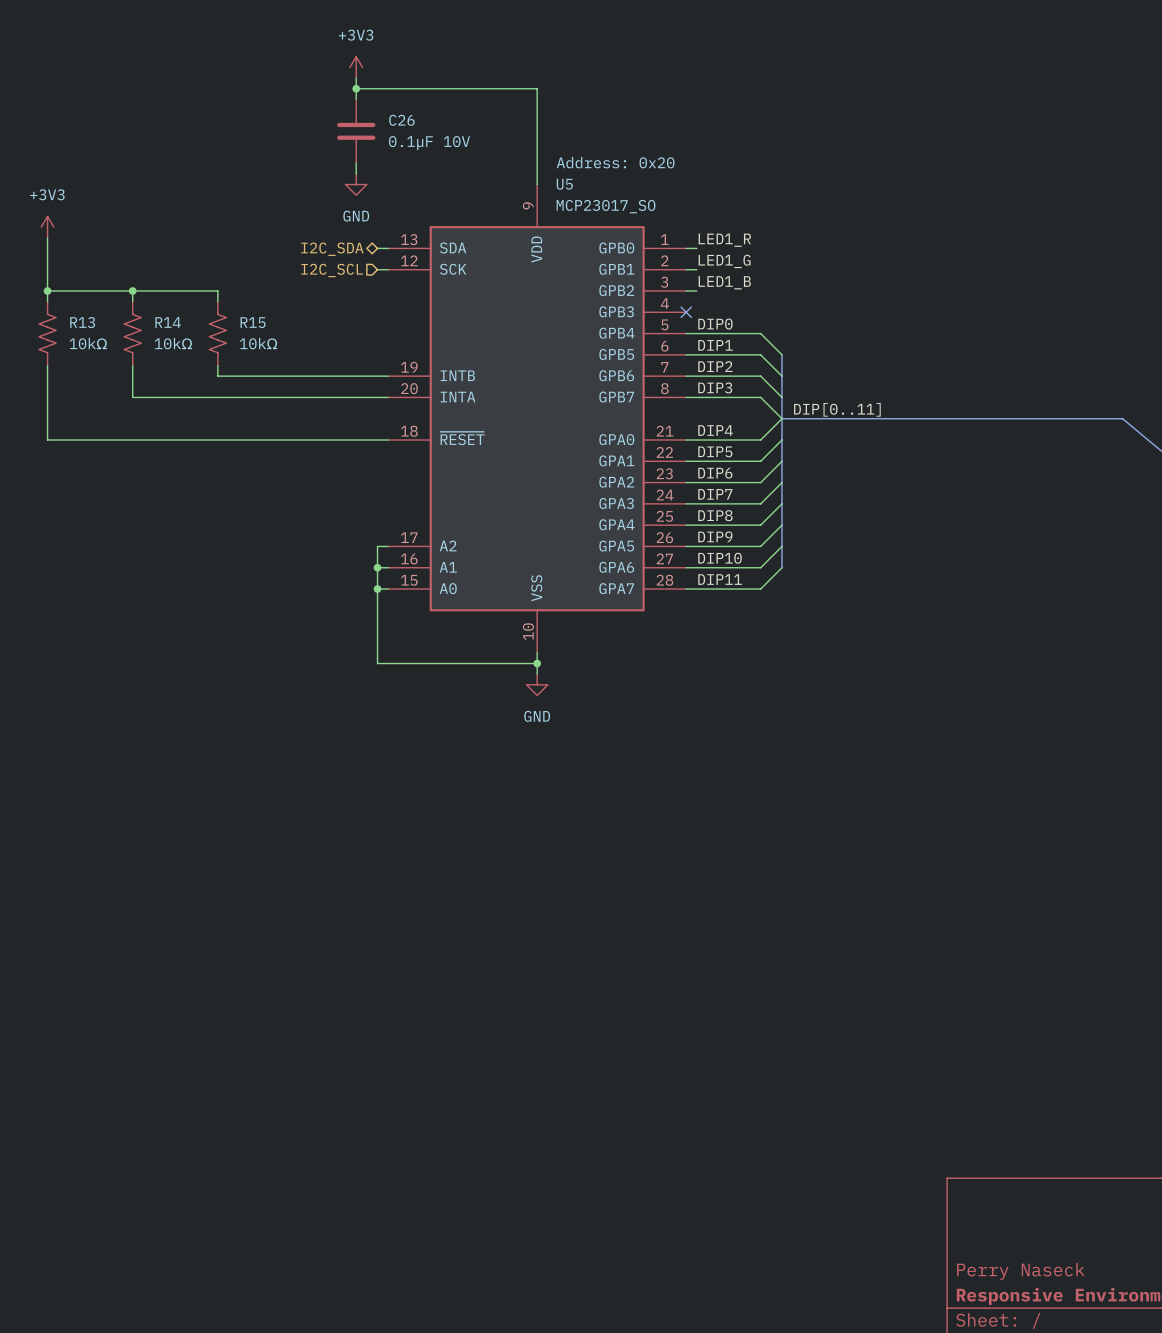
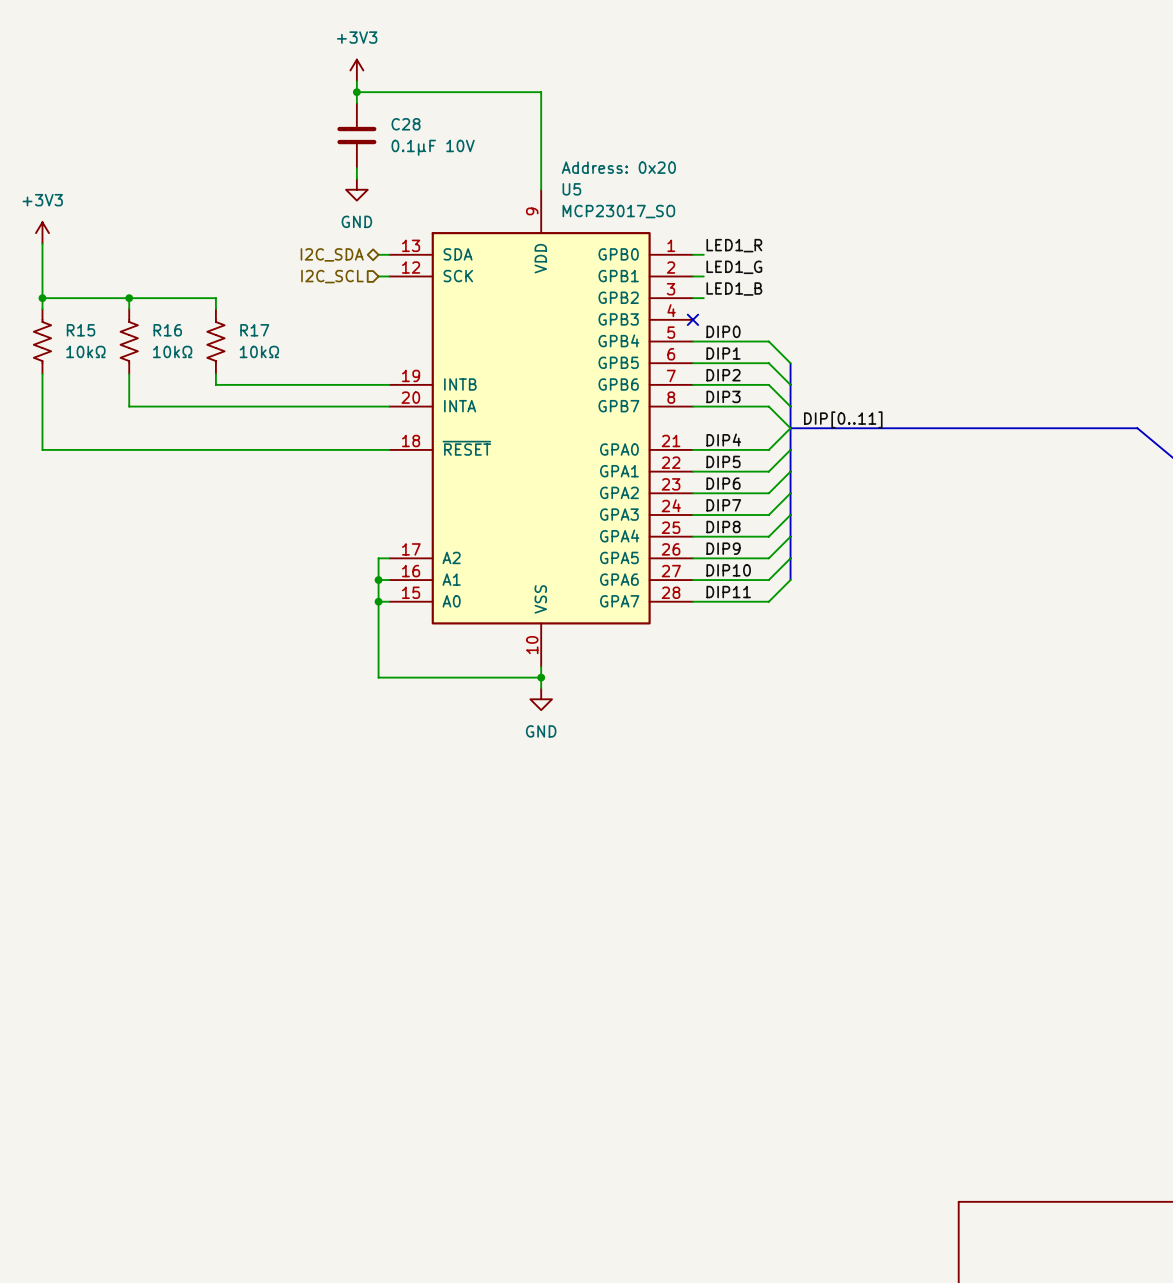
C26 name: C26 (401, 120) -> C28 (406, 124)
R13 name: R13 (82, 322) -> R15 (81, 330)
R14 name: R14 (168, 322) -> R16 (167, 330)
R15 name: R15 (253, 322) -> R17 (254, 330)

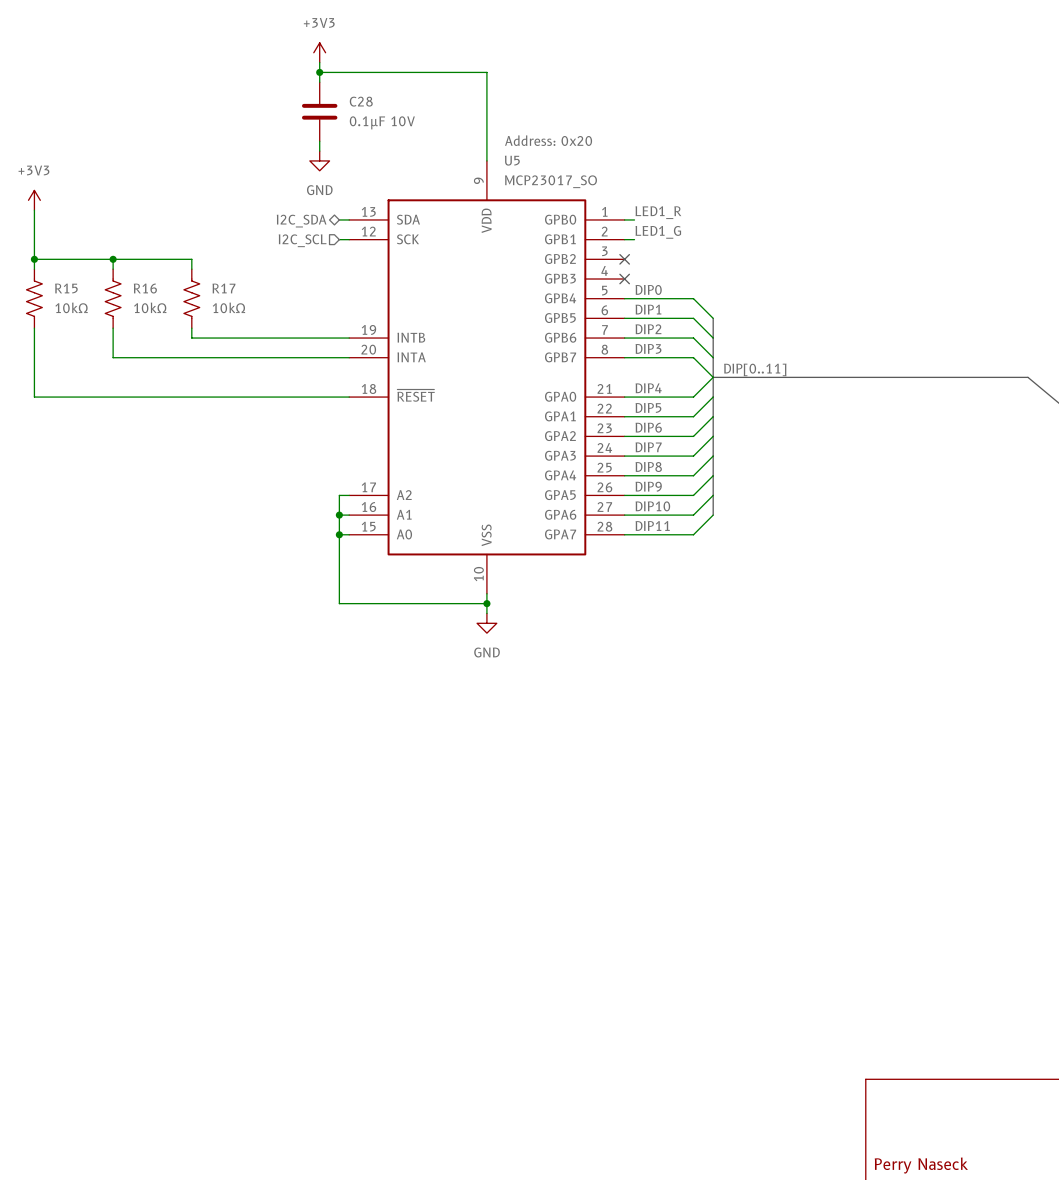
label: LED1_B (734, 289) -> none
wire: (692, 298) (703, 298) -> none
no-connect mark: none -> (624, 259)

